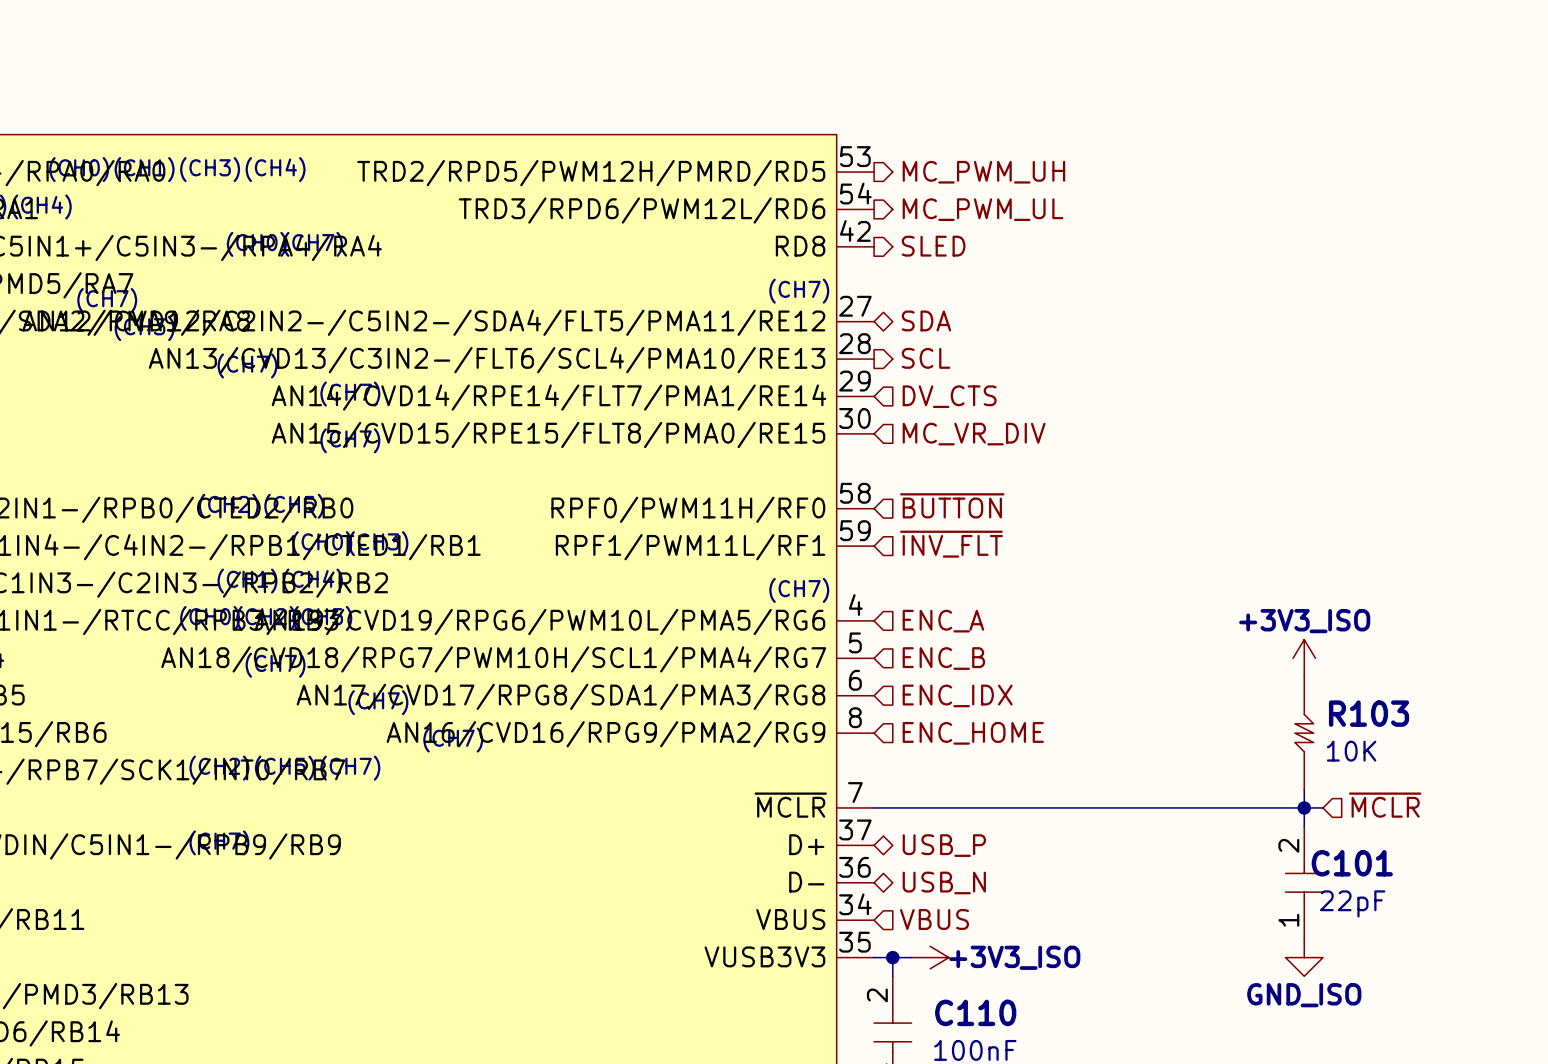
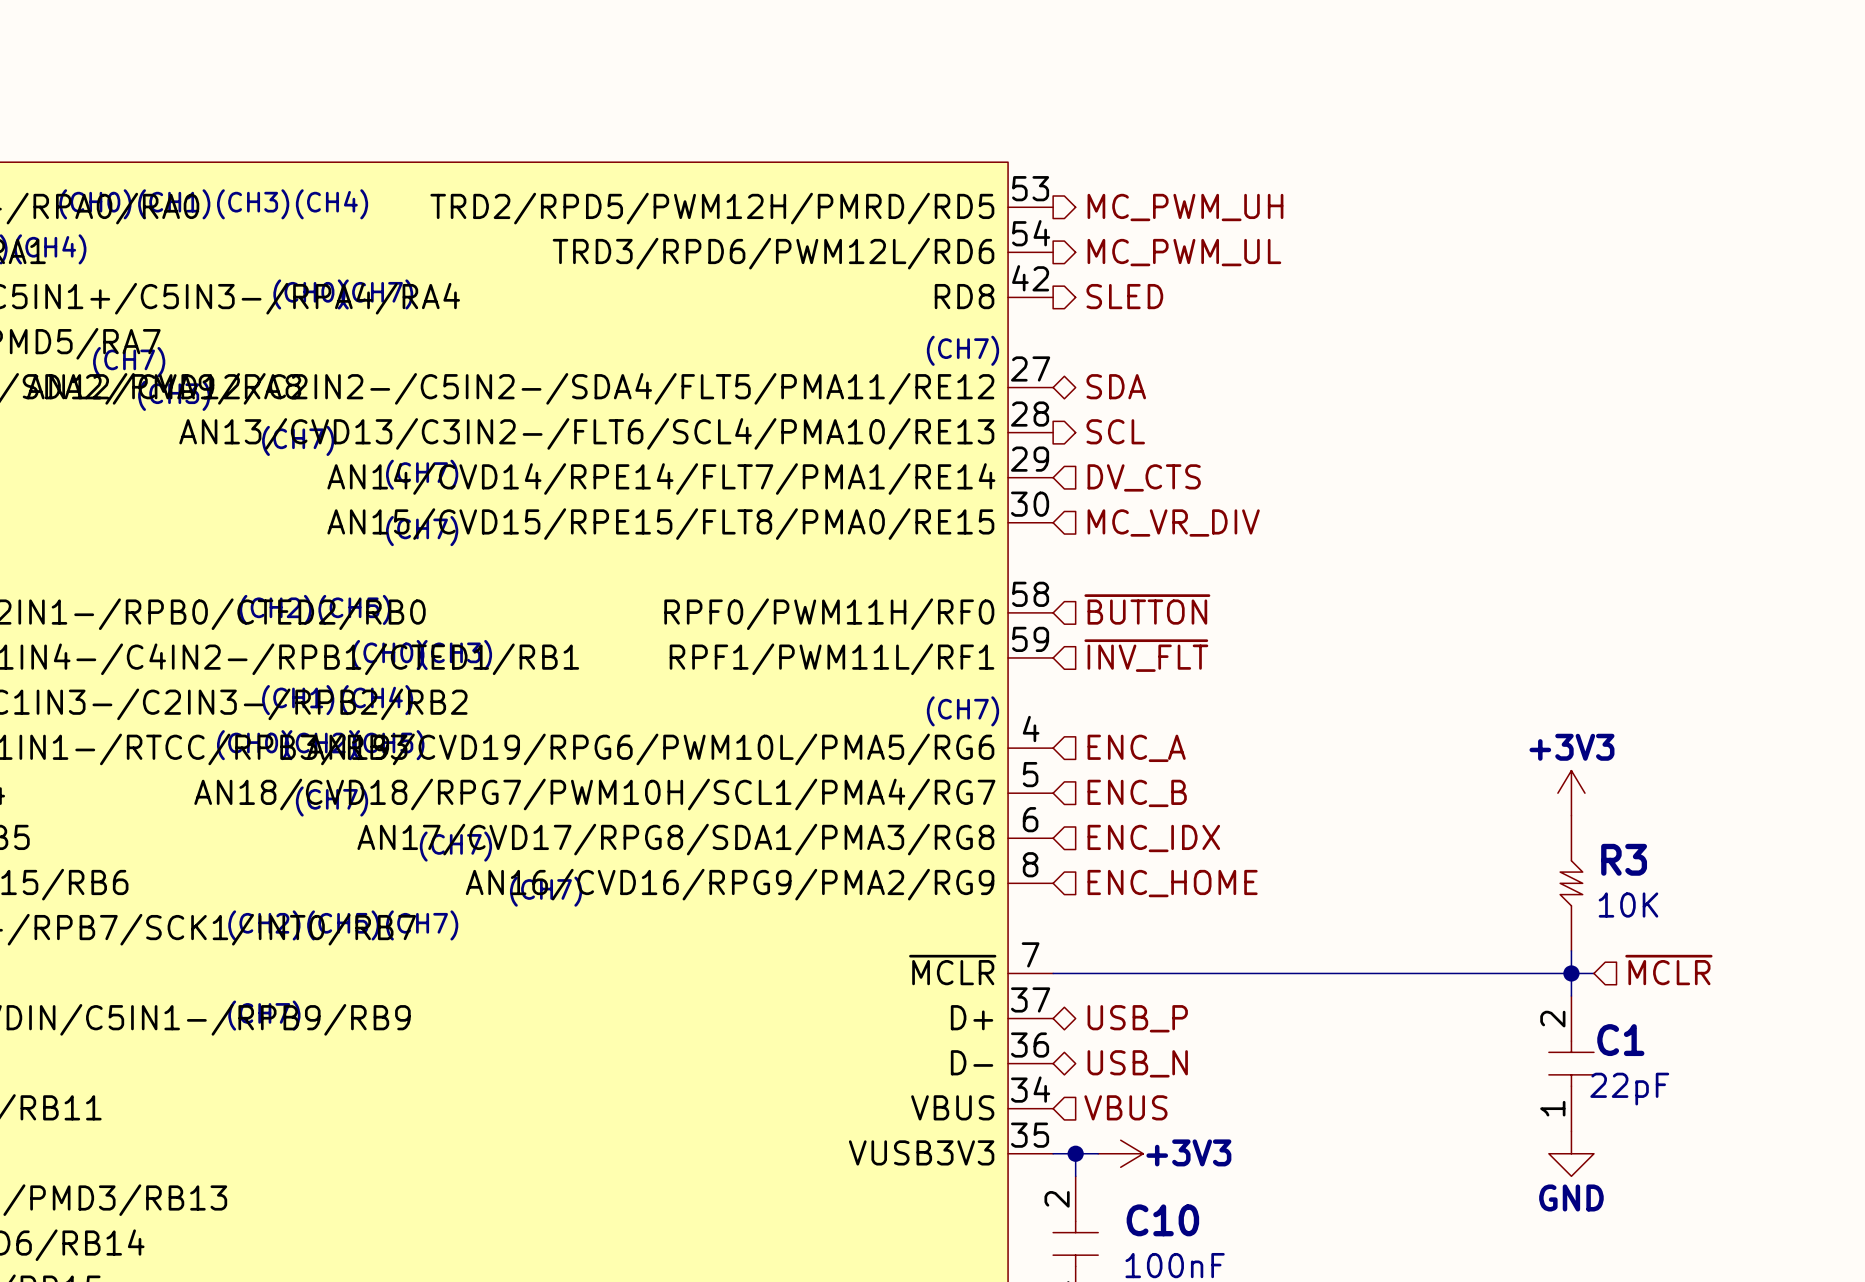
power symbol: +3V3_ISO (1304, 658) -> +3V3 (1571, 793)
R103 name: R103 (1369, 713) -> R3 (1624, 859)
C101 name: C101 (1352, 863) -> C1 (1620, 1040)
power symbol: +3V3_ISO (930, 957) -> +3V3 (1120, 1153)
power symbol: GND_ISO (1304, 957) -> GND (1571, 1153)
C110 name: C110 (975, 1012) -> C10 (1162, 1220)

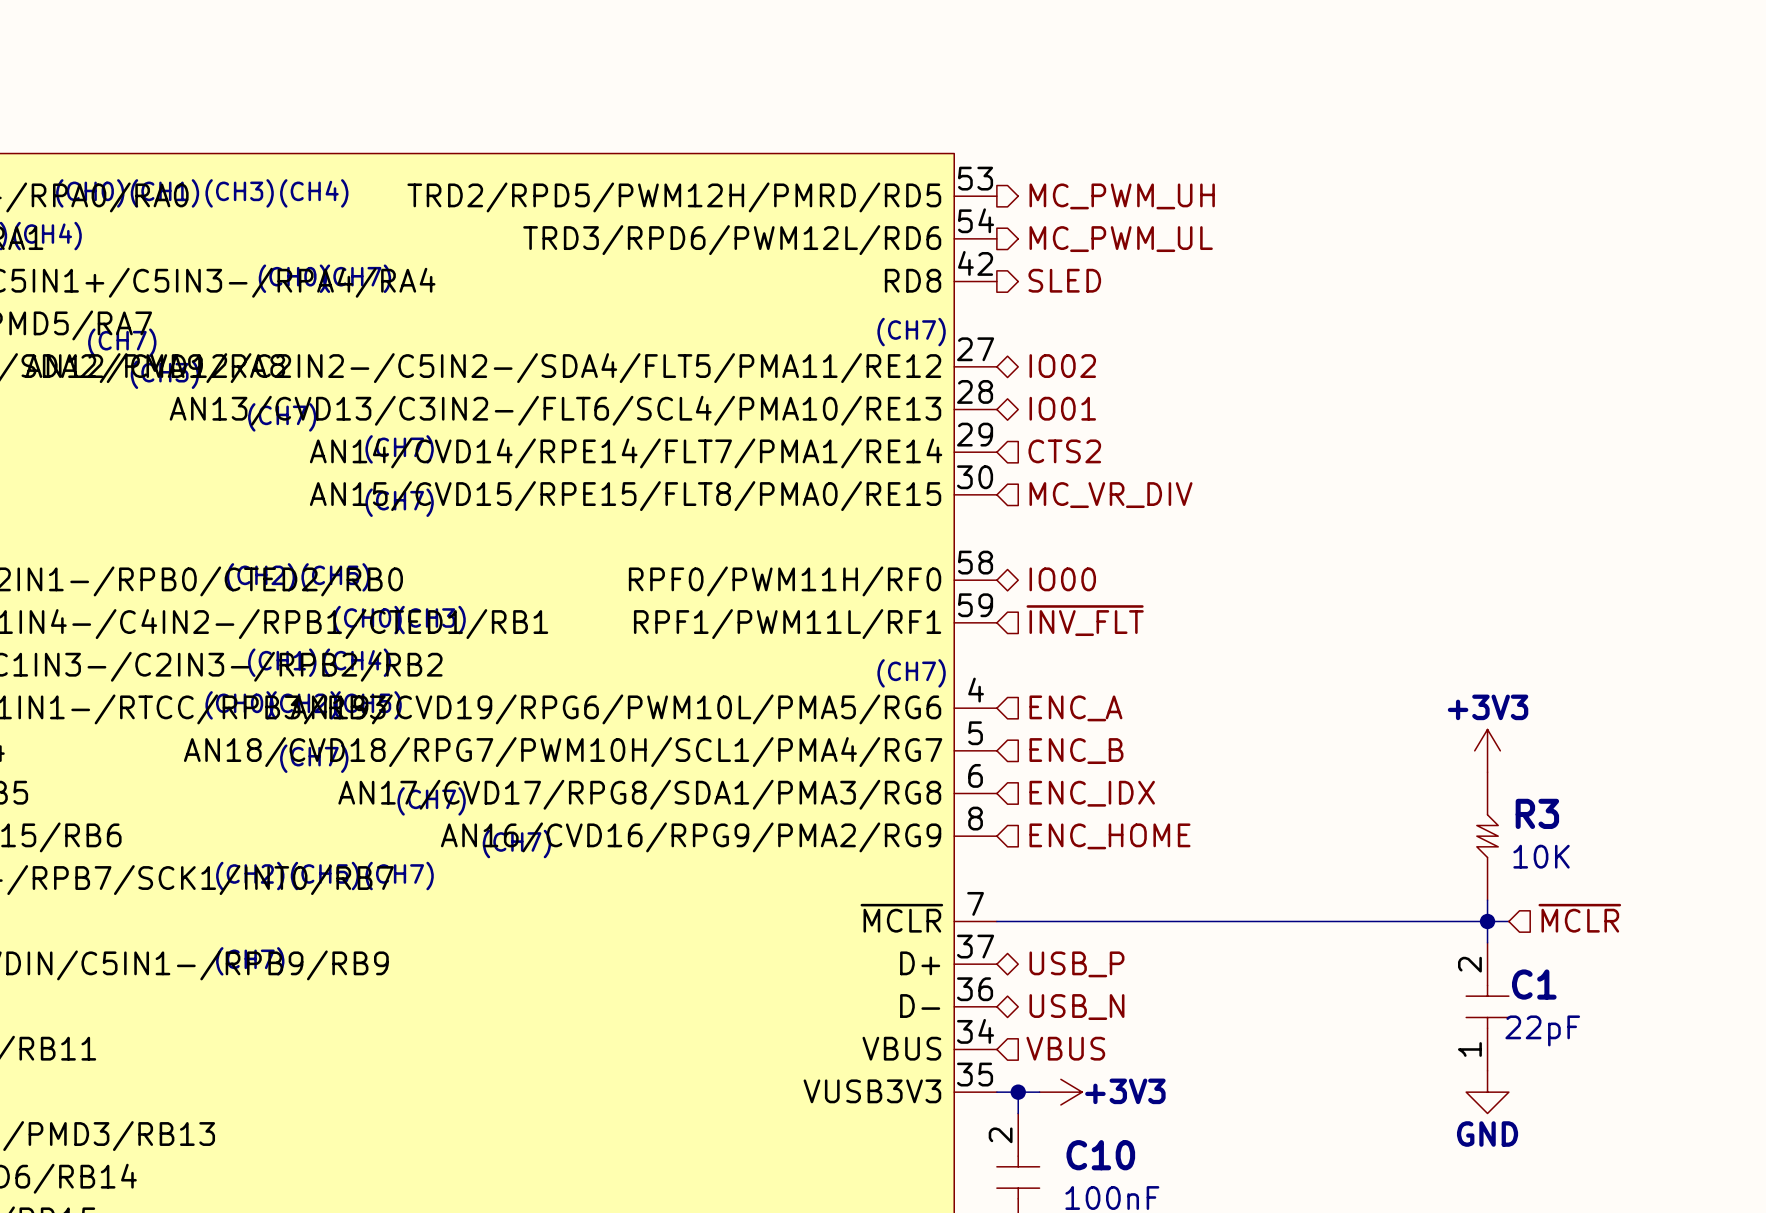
hierarchical label: SDA (1116, 386) -> IO02 (1062, 366)
hierarchical label shape: output (1115, 431) -> bidirectional (1062, 408)
hierarchical label: SCL (1115, 431) -> IO01 (1062, 408)
hierarchical label: DV_CTS (1144, 477) -> CTS2 (1064, 451)
hierarchical label shape: input (1147, 609) -> bidirectional (1062, 579)
hierarchical label: ~{BUTTON} (1147, 609) -> IO00 (1062, 579)

